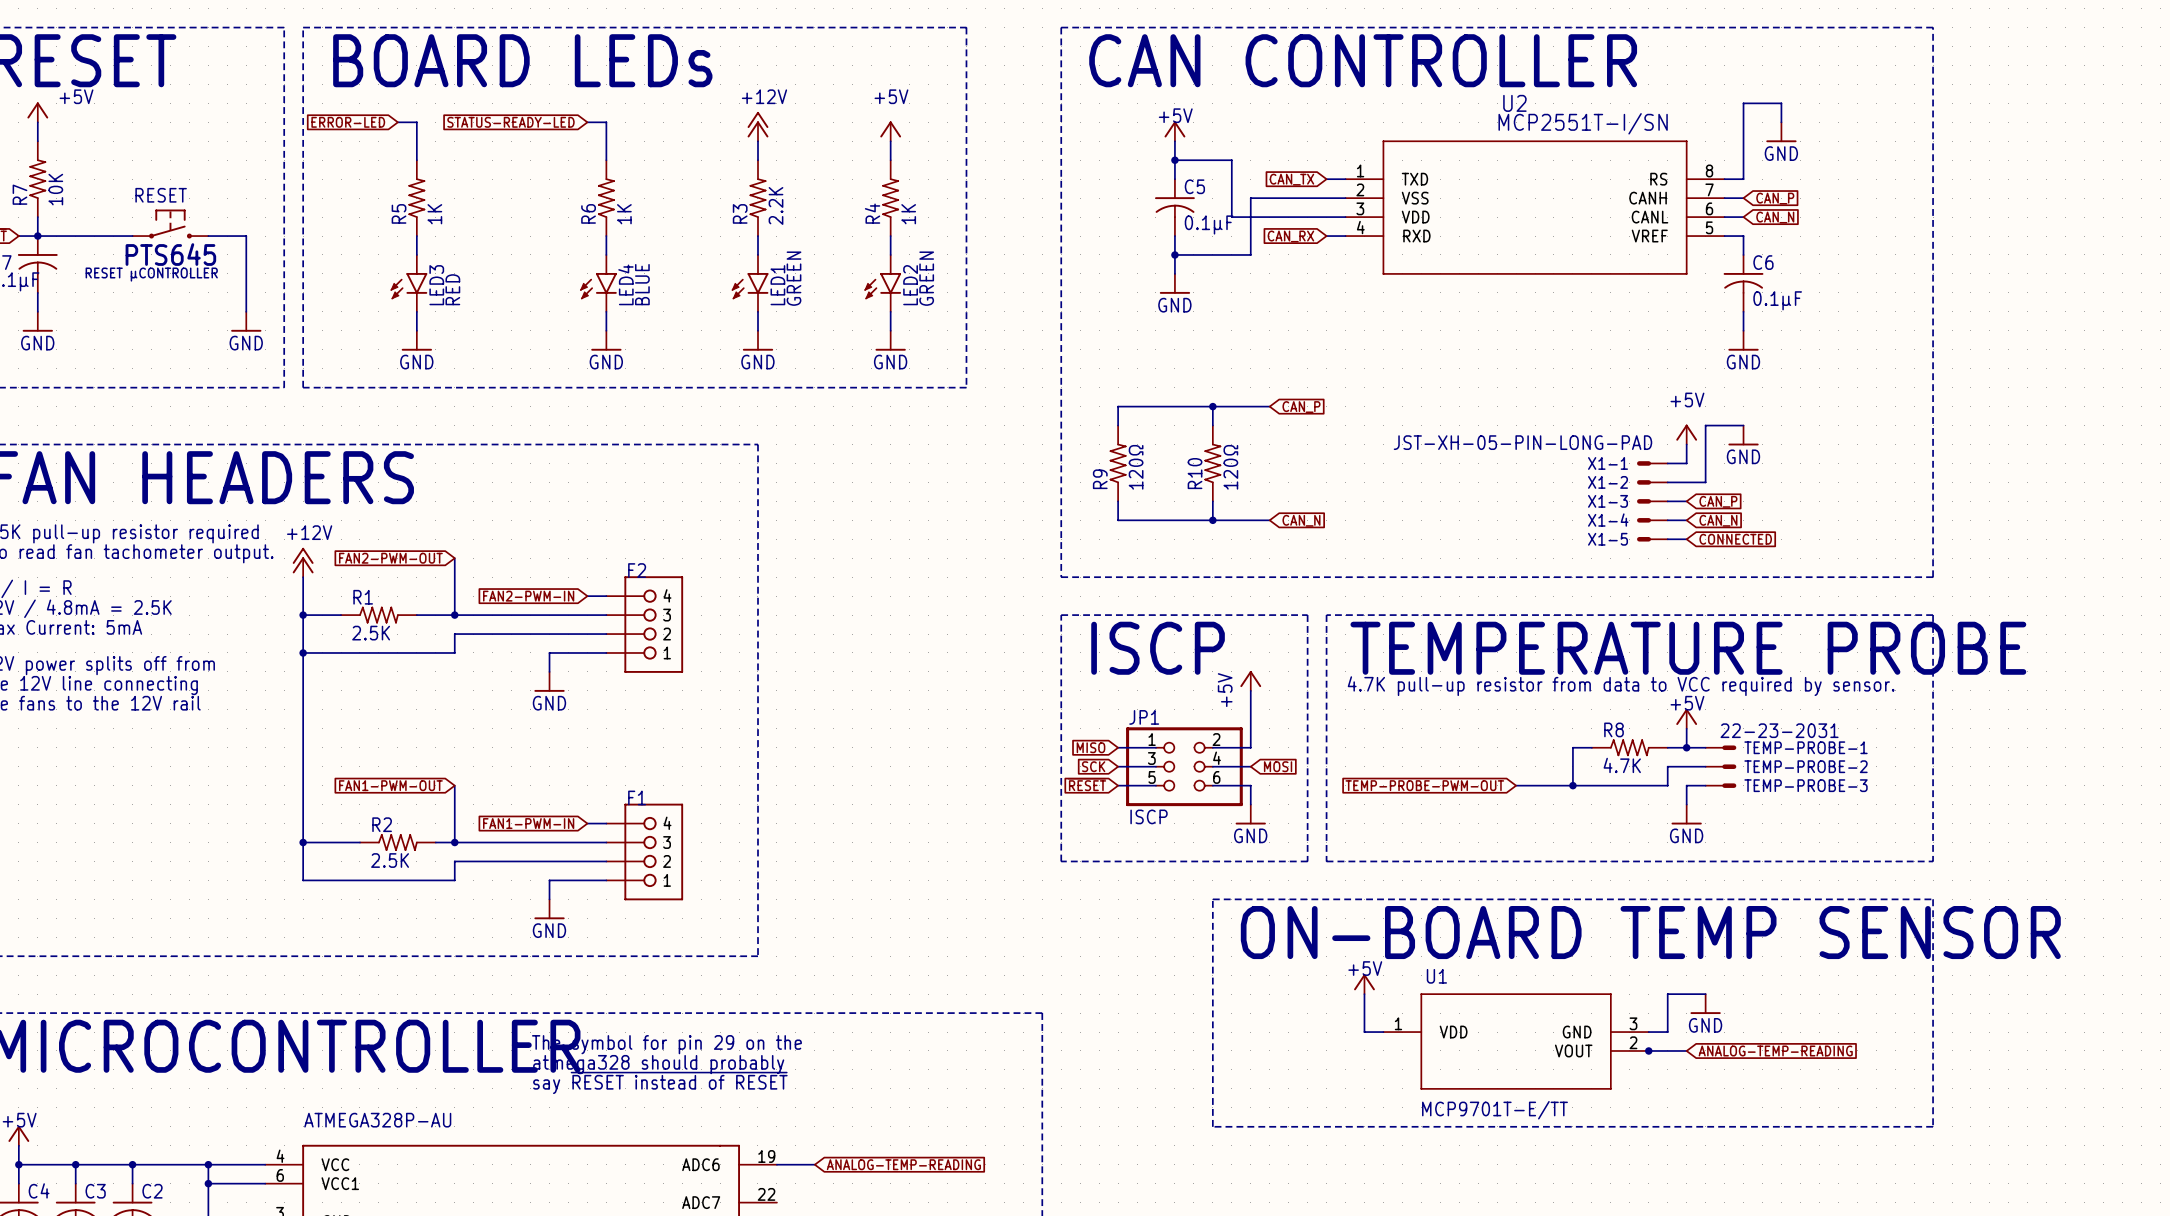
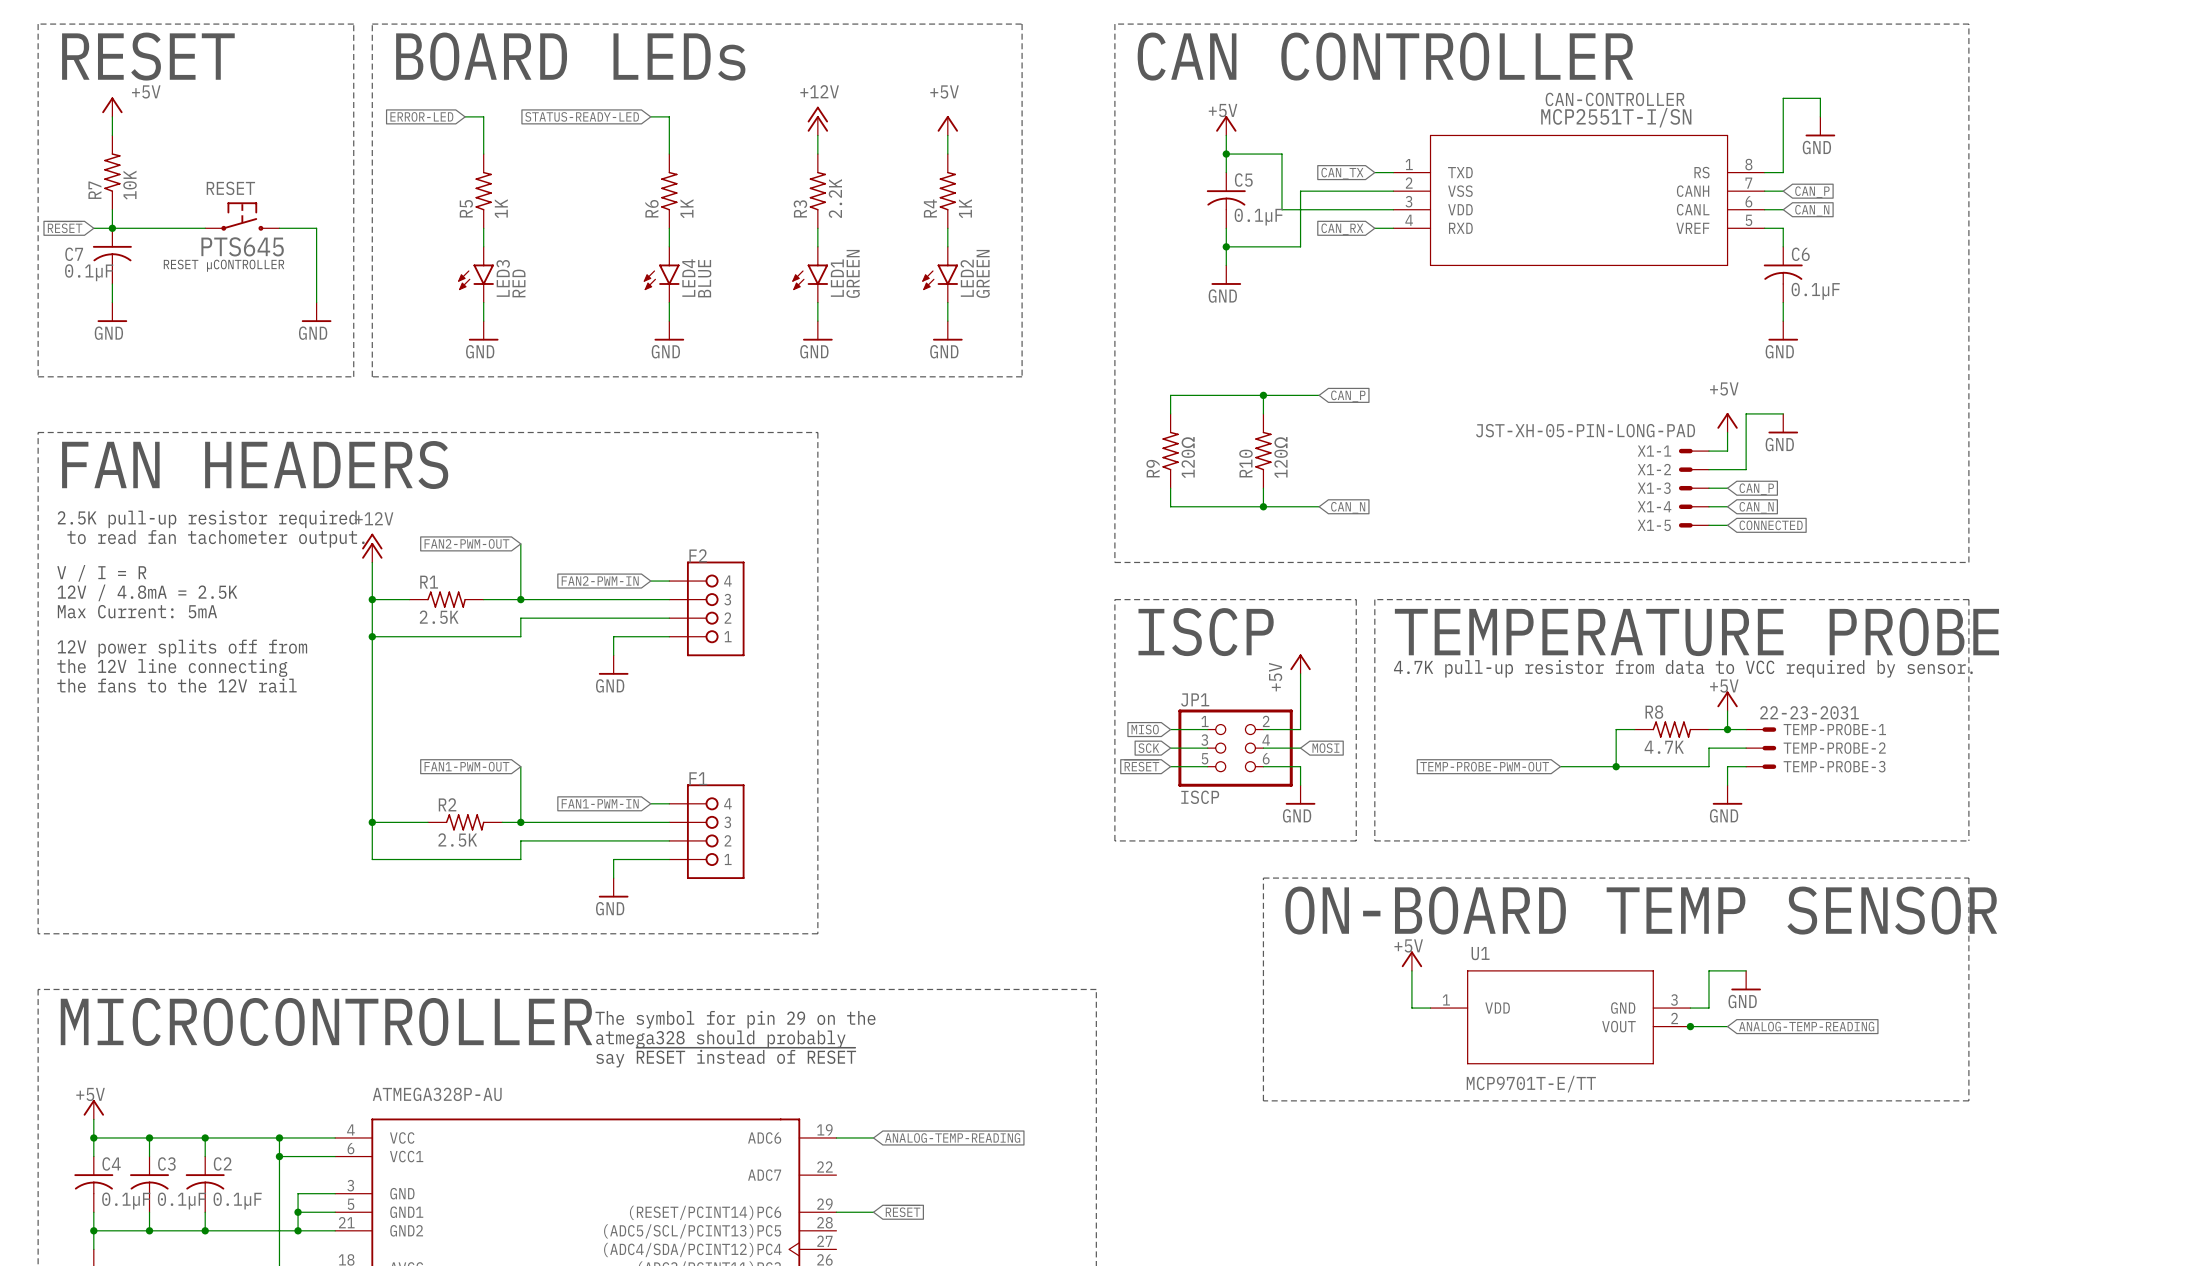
U2 name: U2 (1514, 103) -> CAN-CONTROLLER (1615, 99)

